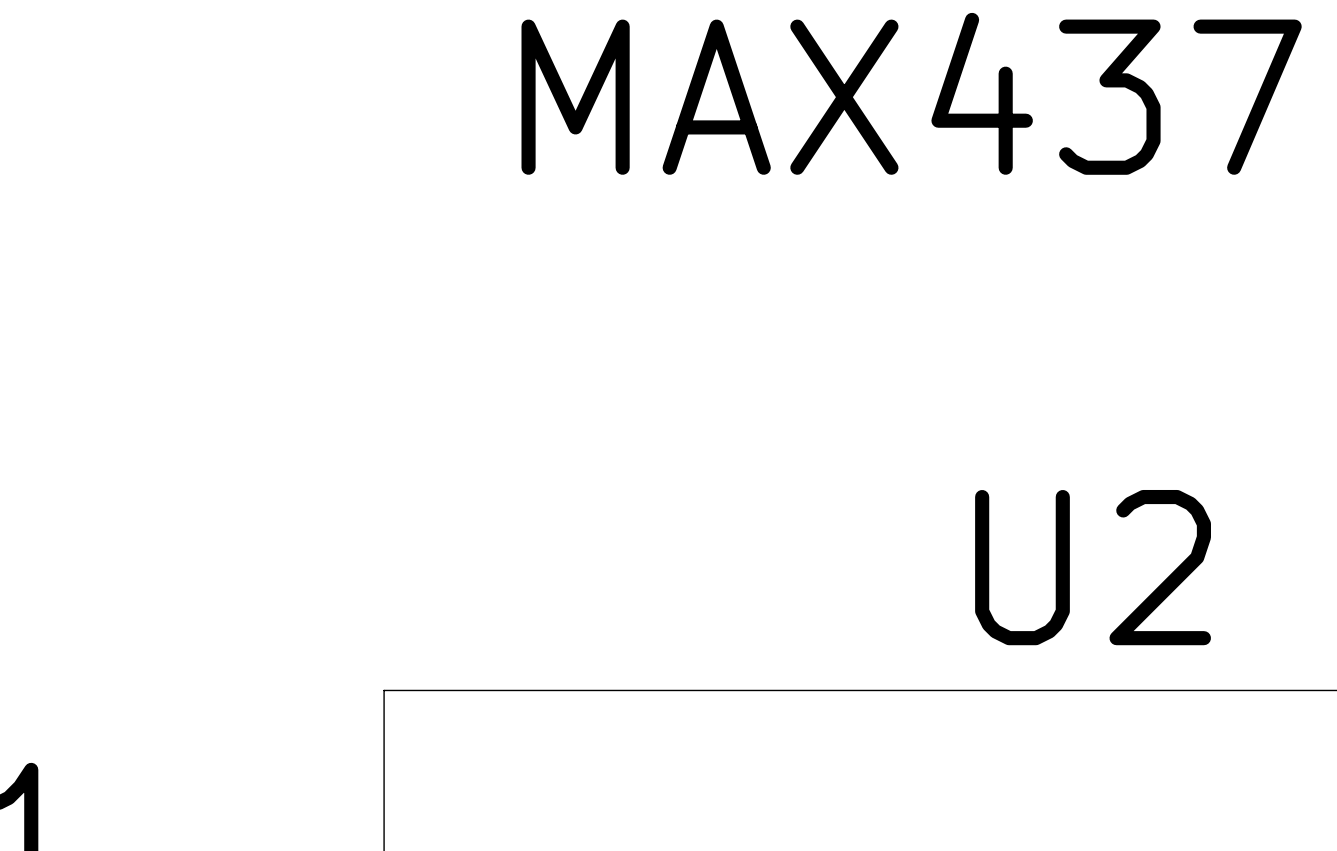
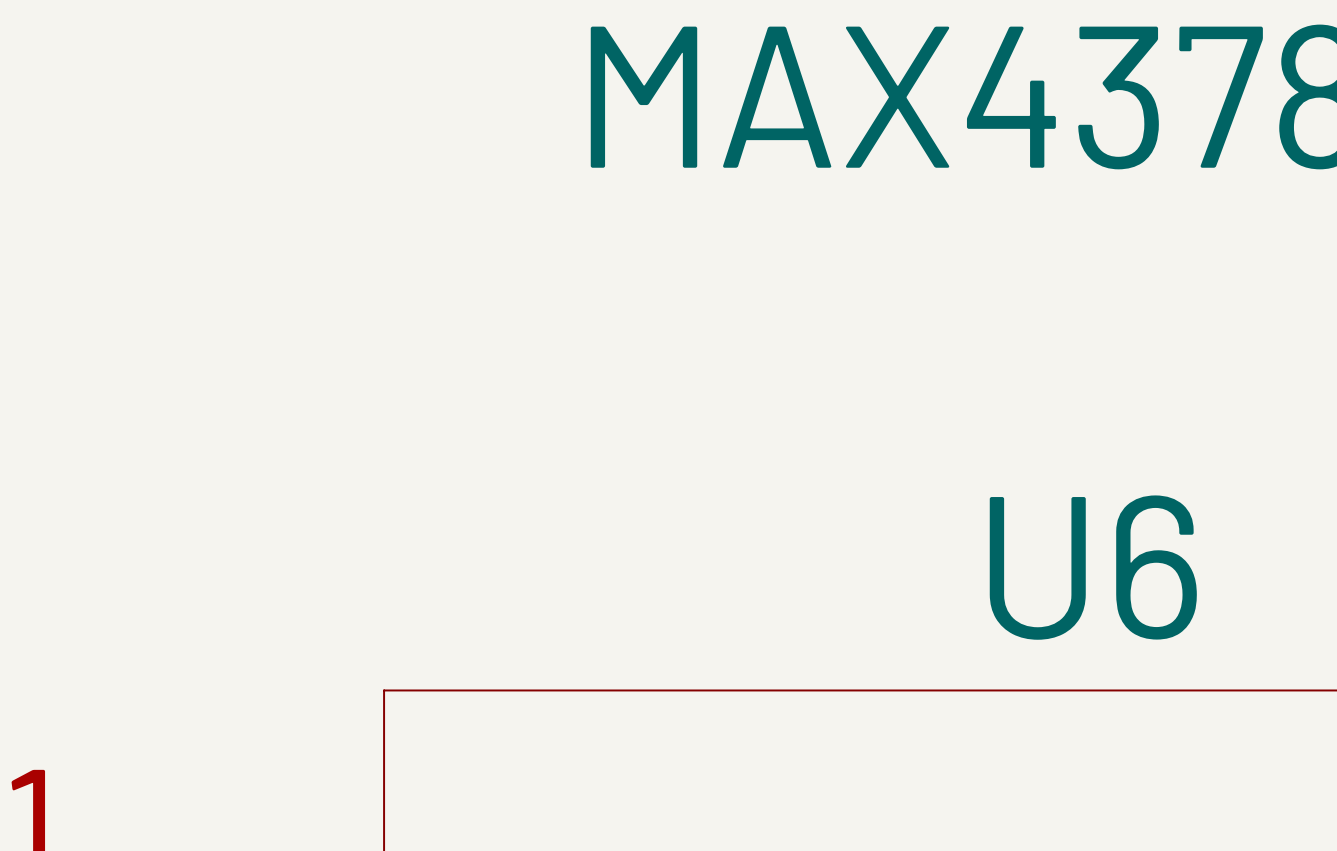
U2 name: U2 (1093, 567) -> U6 (1093, 567)

